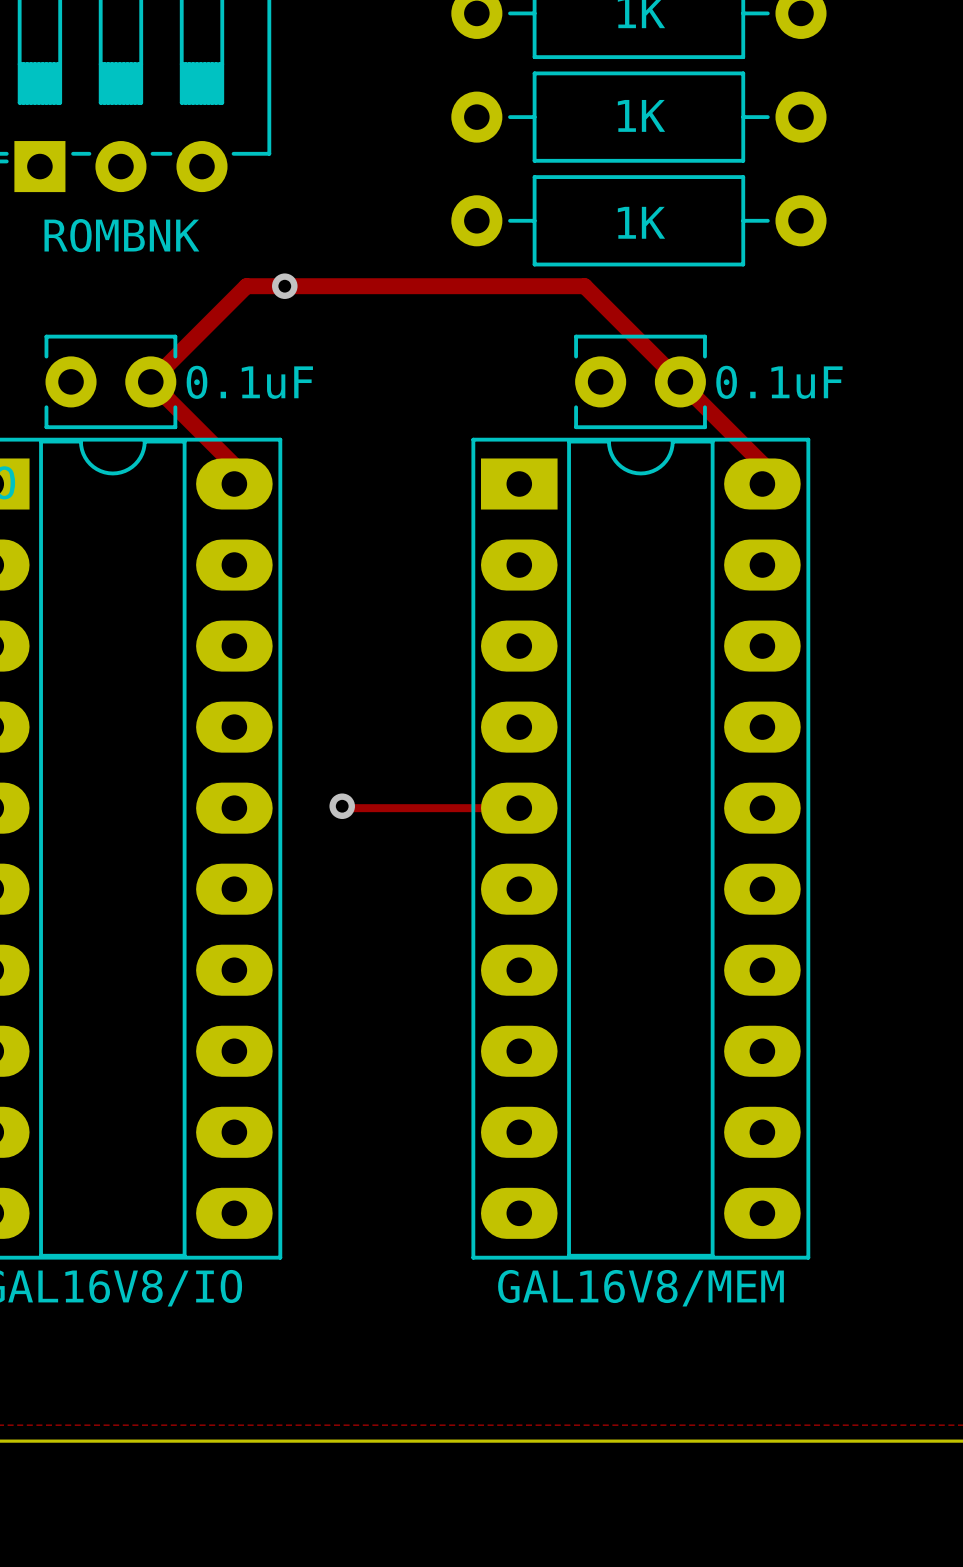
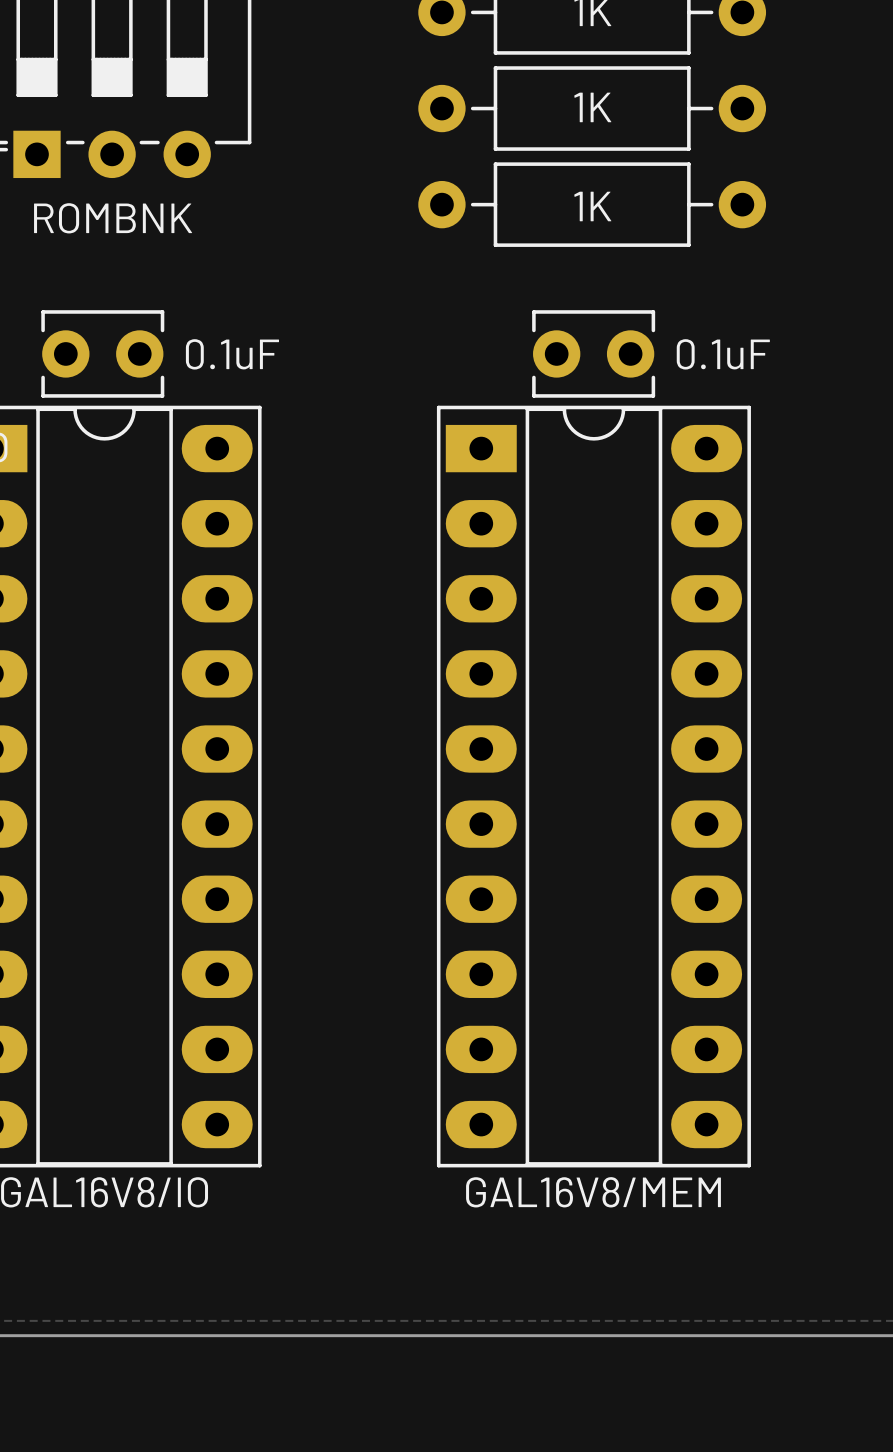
via: (284, 286) -> none
track: (234, 484) (234, 465) (150, 381) (246, 286) (584, 286) (762, 463) (762, 484) -> none
track: (342, 806) (344, 808) (519, 808) -> none
via: (342, 806) -> none

